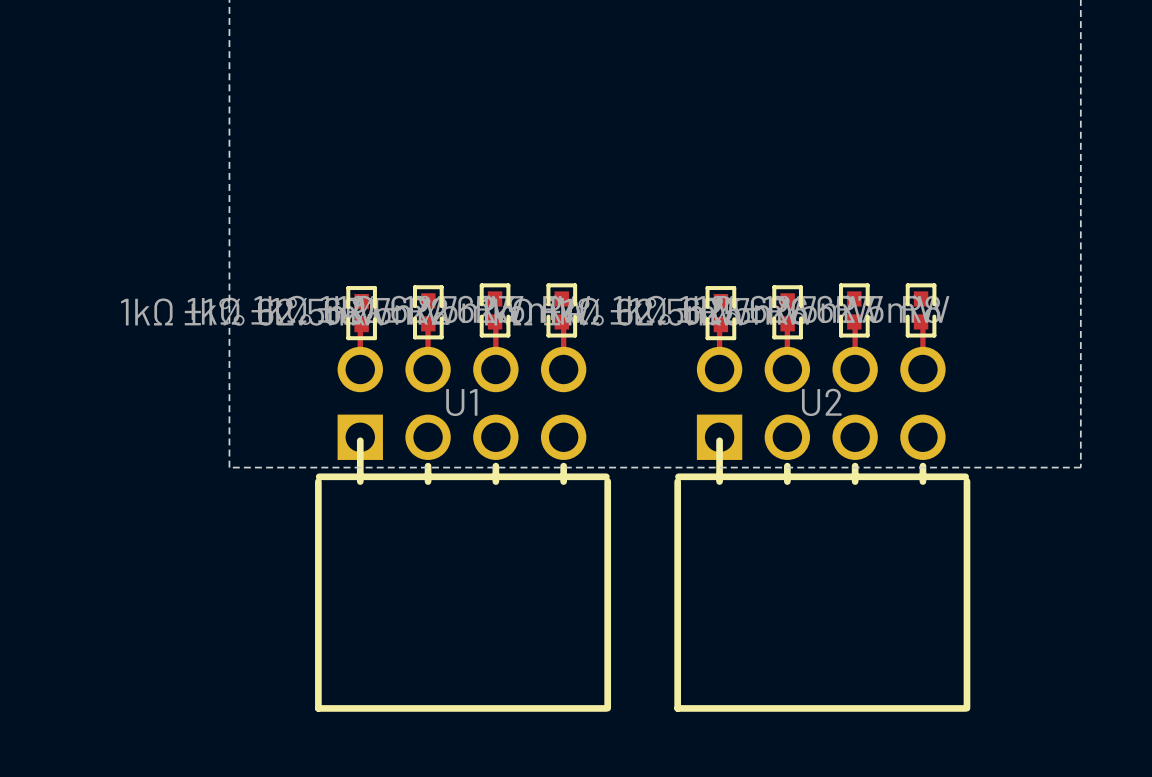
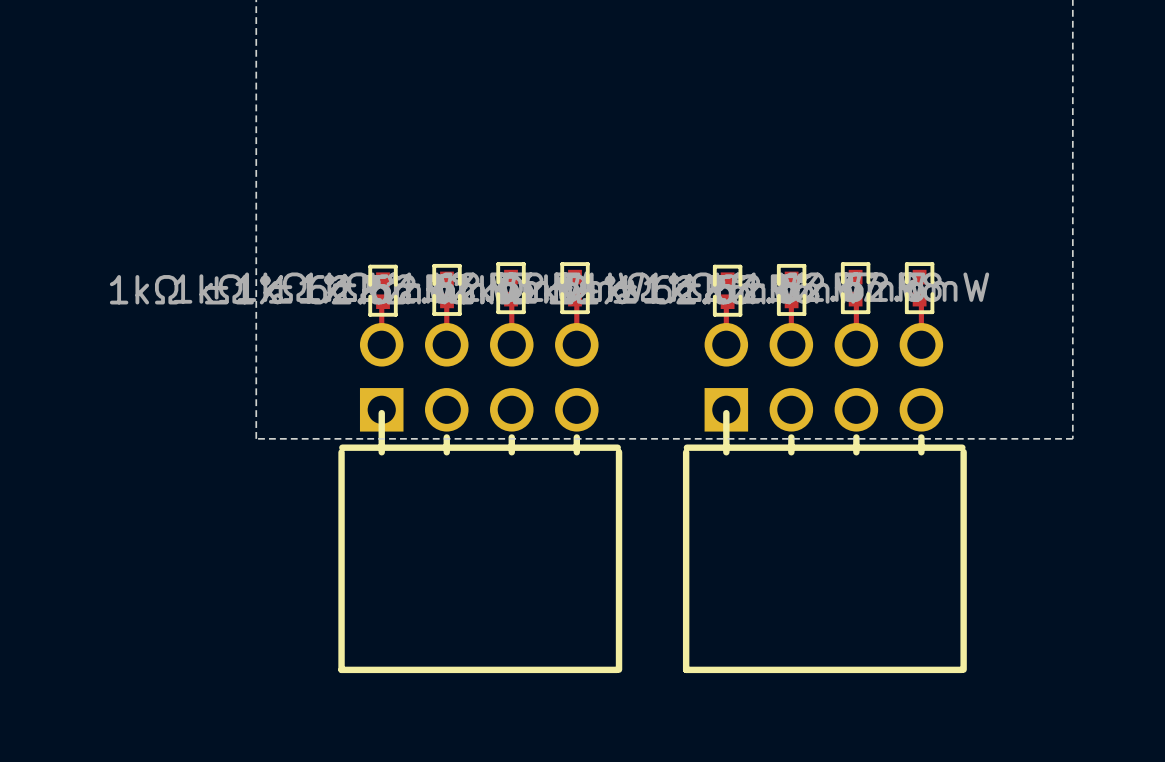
U1 name: U1 (461, 402) -> none
U2 name: U2 (821, 402) -> none

